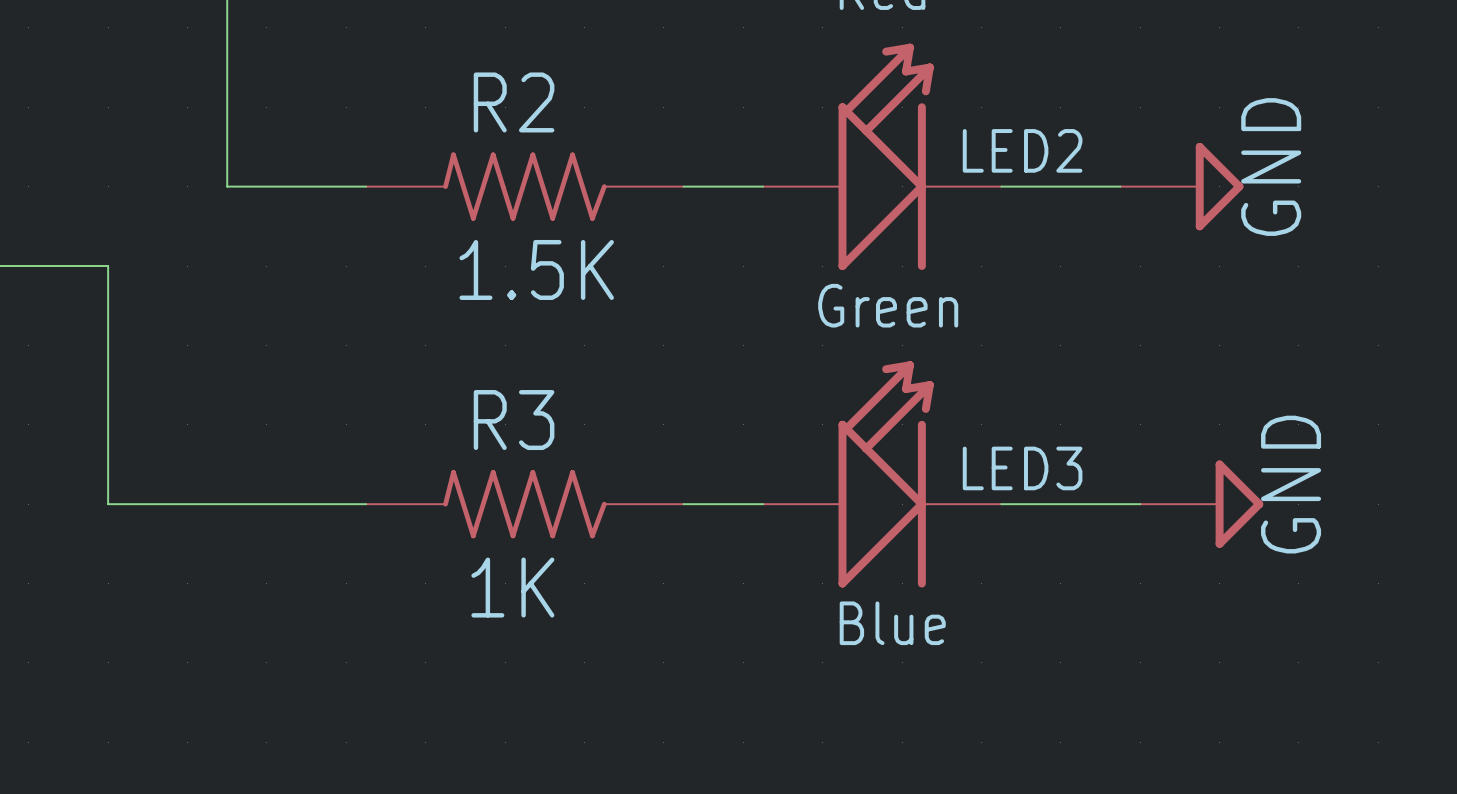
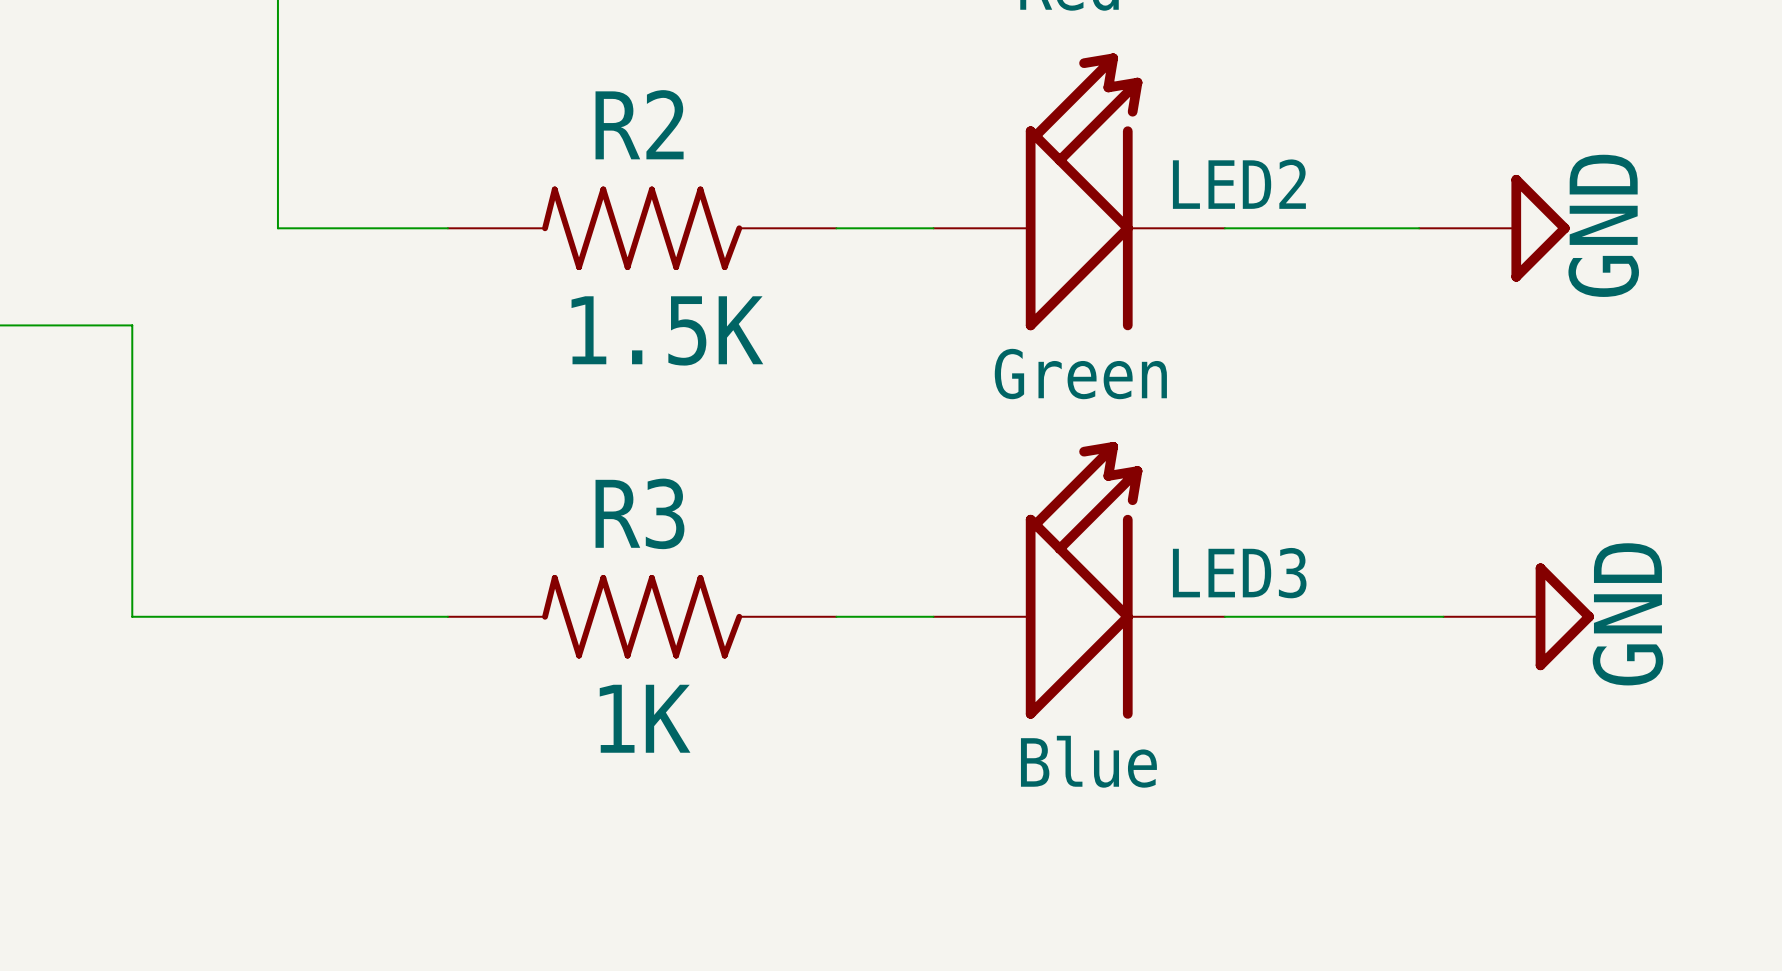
power symbol position: GND (1181, 186) -> GND (1494, 228)
power symbol position: GND (1201, 504) -> GND (1518, 616)

